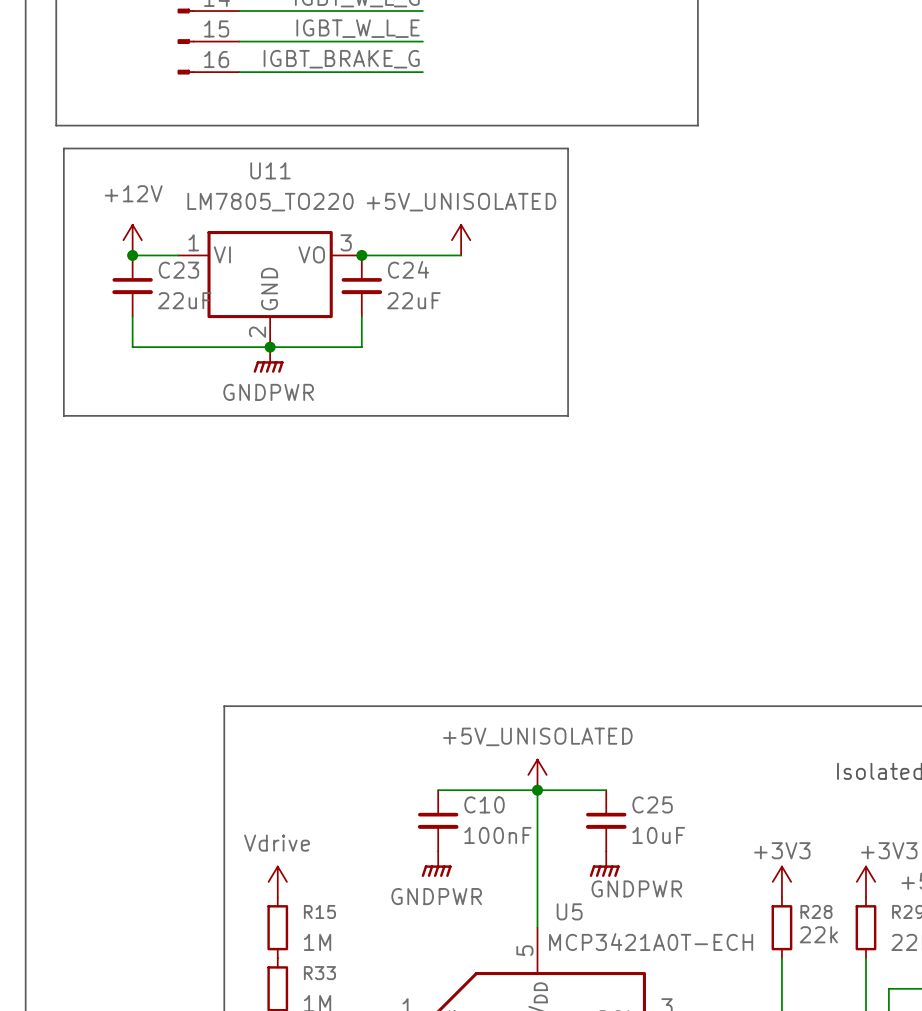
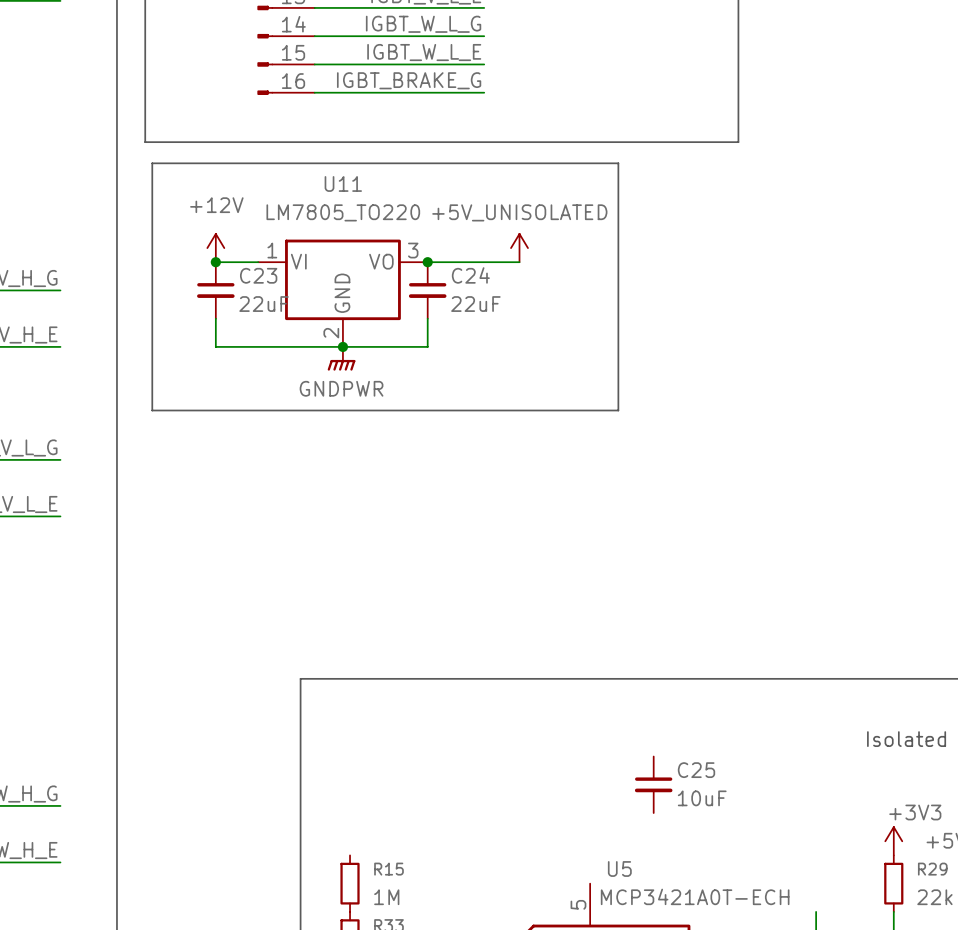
power symbol: +5V_UNISOLATED (537, 774) -> none
wire: (438, 790) (606, 790) -> none
wire: (537, 790) (537, 927) -> none
junction: (537, 790) -> none
C10: 100nF (438, 820) -> none
power symbol: GNDPWR (436, 864) -> none
power symbol: GNDPWR (604, 864) -> none
power symbol: Vdrive (277, 881) -> none
power symbol: +3V3 (781, 881) -> none
R28: 22k (781, 927) -> none

